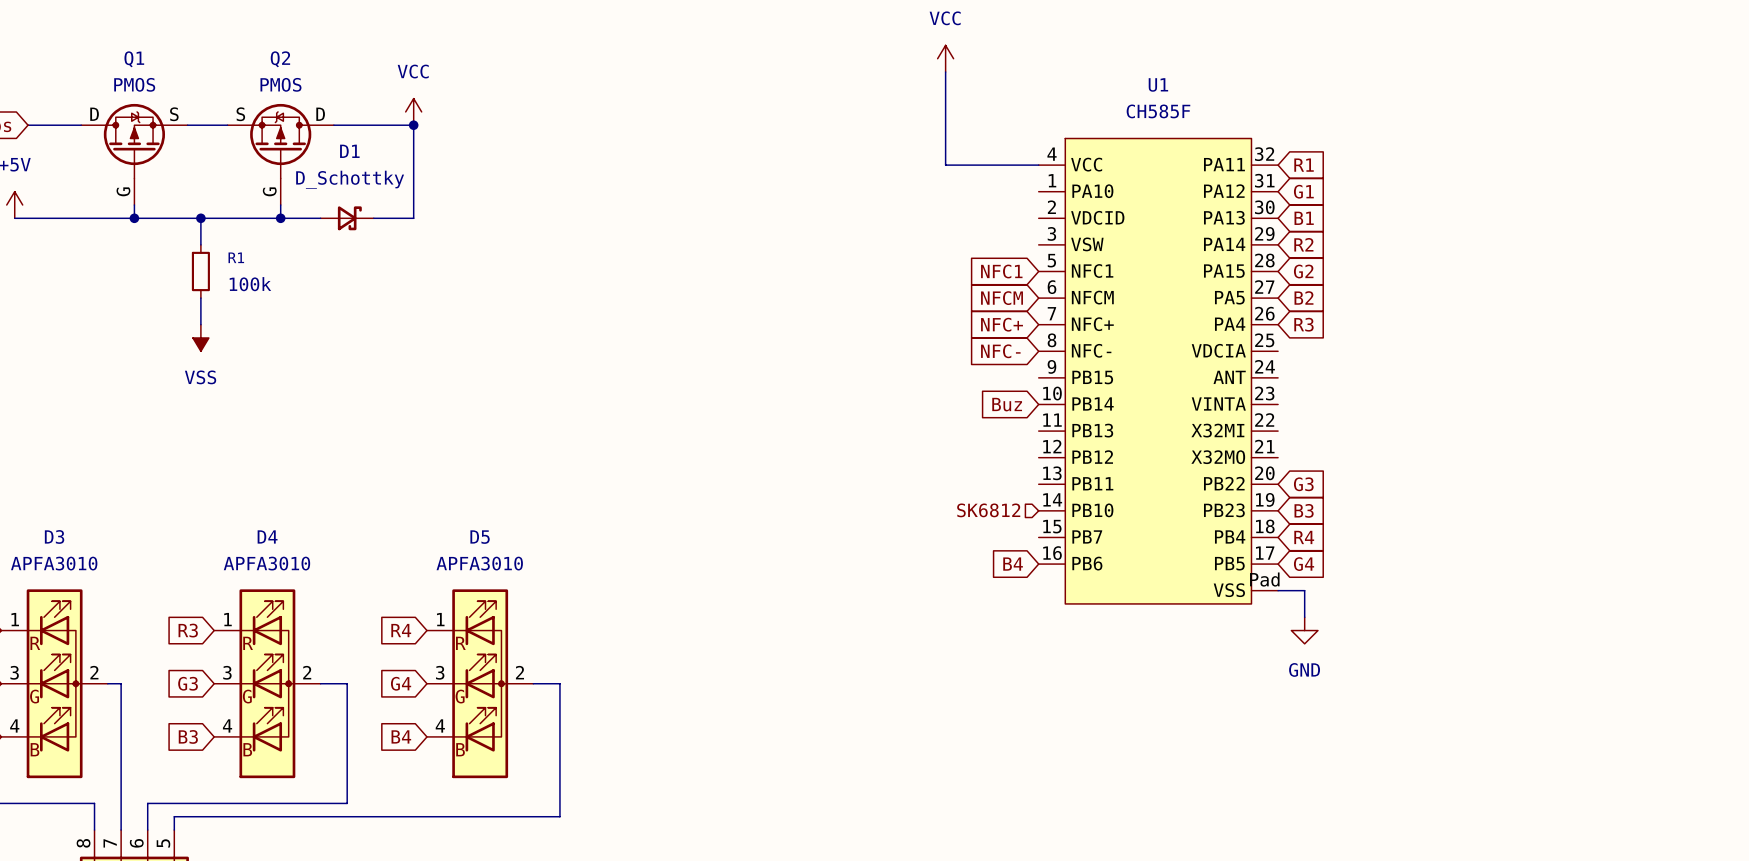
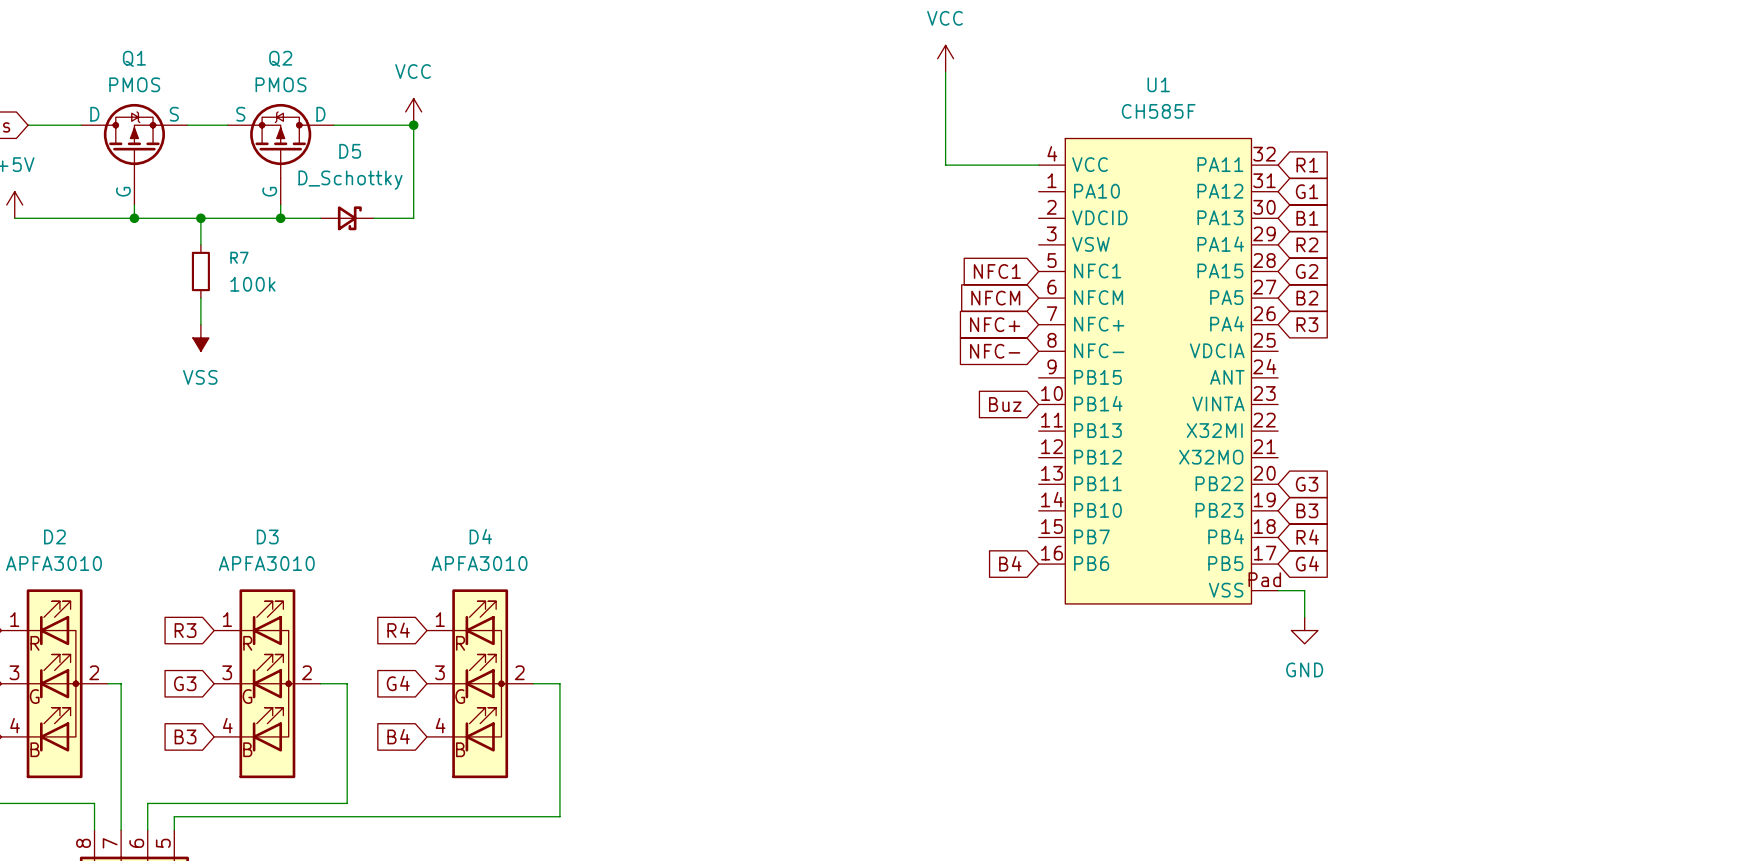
D1 name: D1 (349, 151) -> D5 (350, 151)
R1 name: R1 (236, 257) -> R7 (239, 257)
hierarchical label: SK6812 (988, 510) -> none
D3 name: D3 (54, 536) -> D2 (54, 536)
D4 name: D4 (267, 536) -> D3 (267, 536)
D5 name: D5 (480, 537) -> D4 (480, 536)

